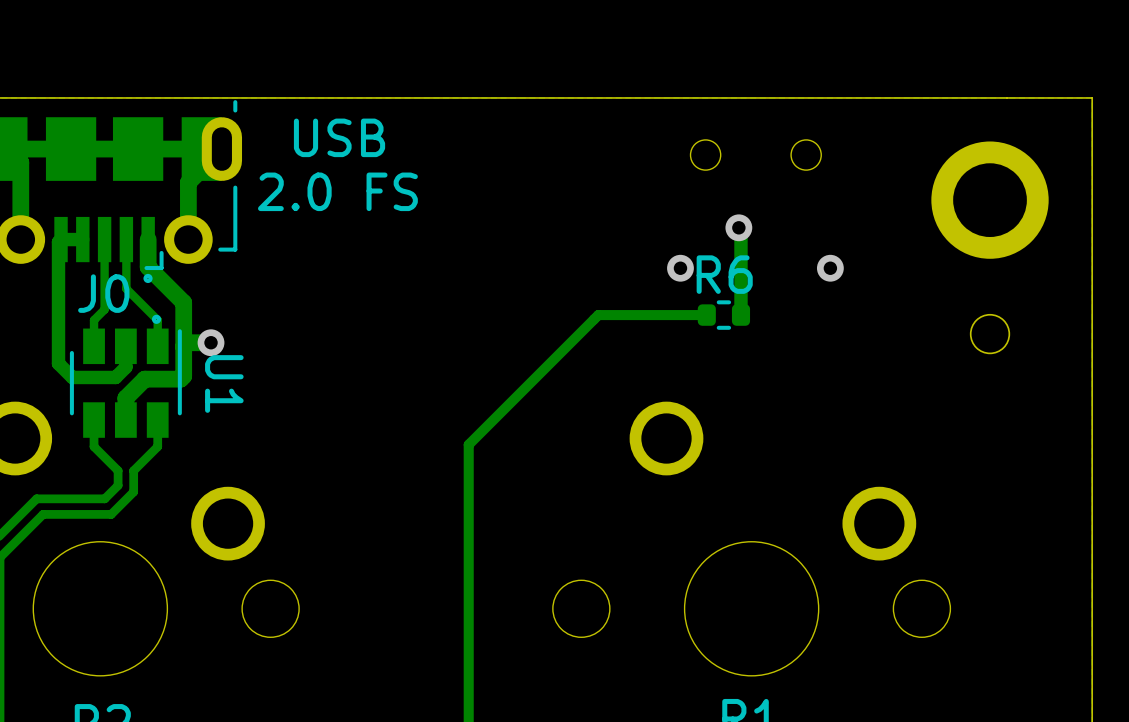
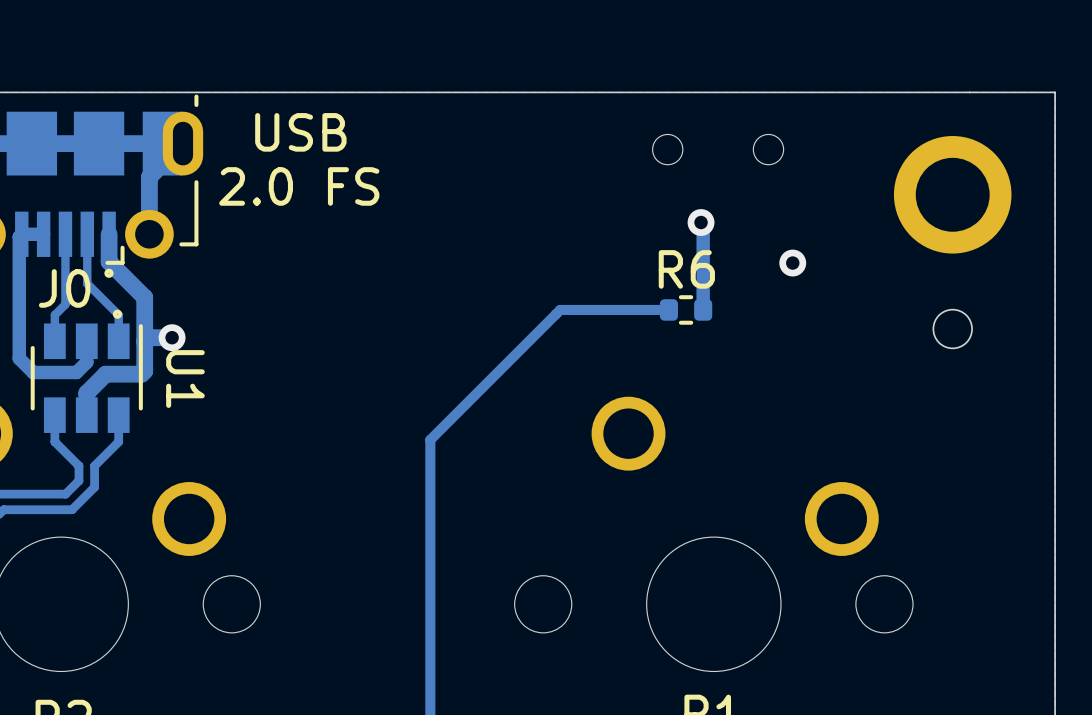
via: (680, 268) -> none

